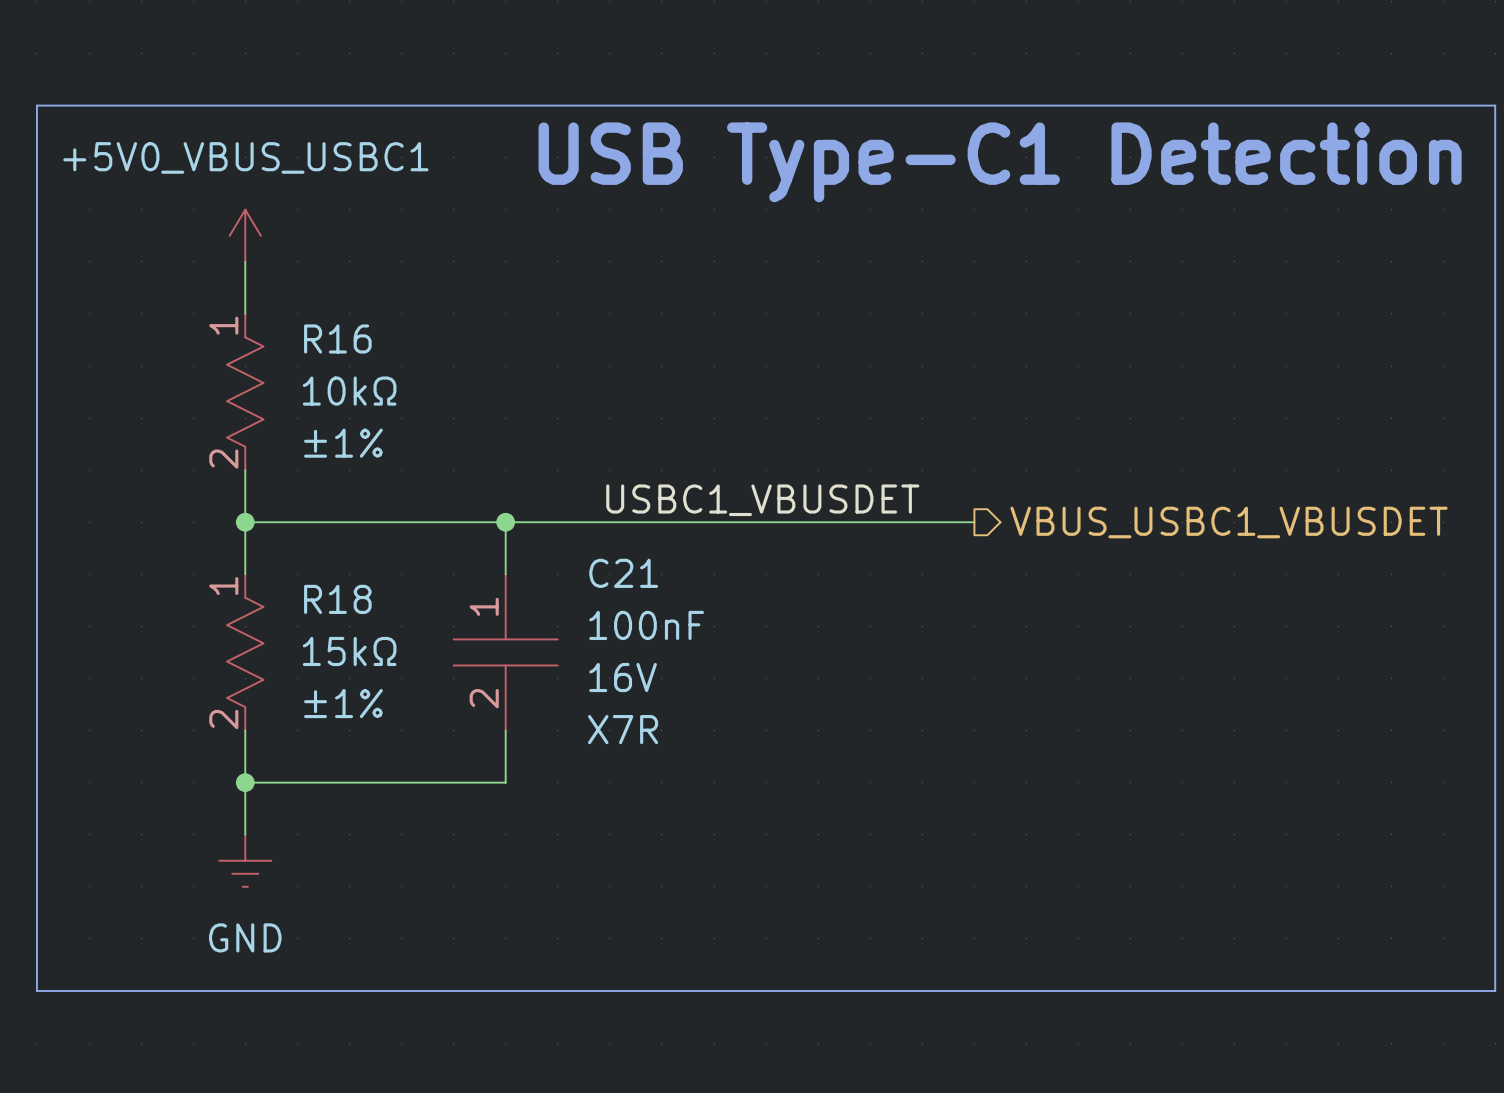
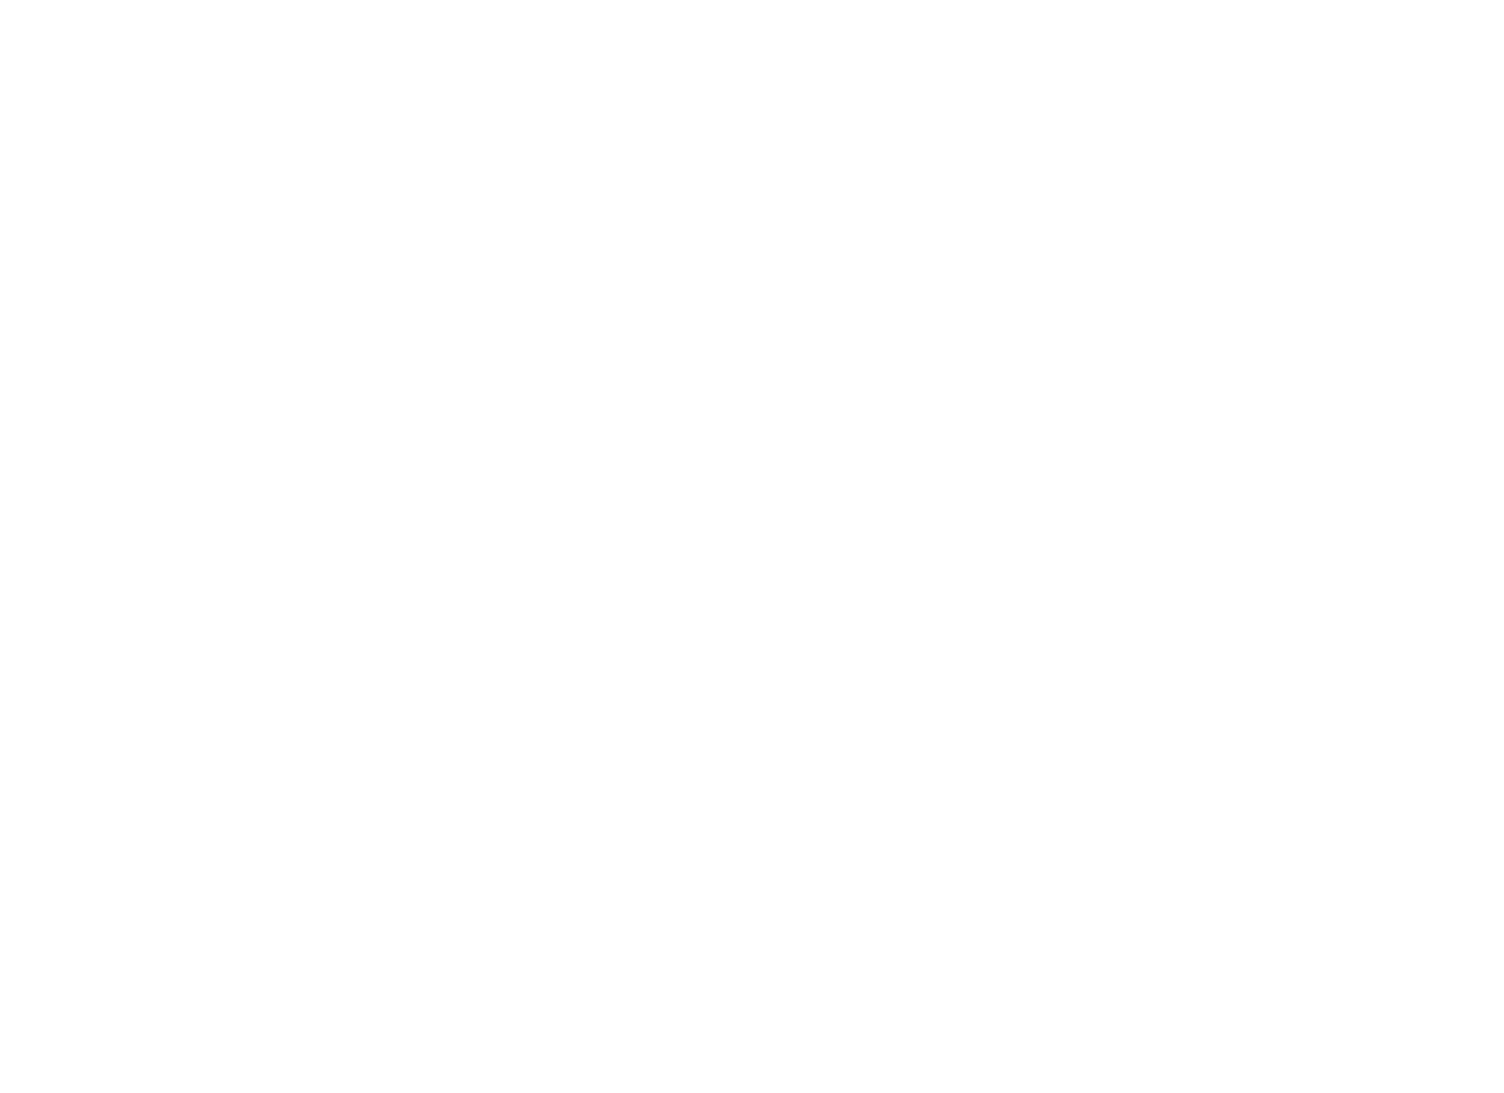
line: (36, 105) (1495, 105) (1495, 990) (36, 990) (36, 105) -> none
text: USB Type-C1 Detection (1000, 162) -> none
power symbol: +5V0_VBUS_USBC1 (245, 235) -> none
wire: (245, 261) (245, 313) -> none
R16: (245, 392) -> none
wire: (245, 470) (245, 574) -> none
label: USBC1_VBUSDET (762, 500) -> none
wire: (245, 522) (974, 522) -> none
junction: (245, 522) -> none
wire: (505, 522) (505, 574) -> none
junction: (505, 522) -> none
hierarchical label: VBUS_USBC1_VBUSDET (1229, 522) -> none
R18: (245, 652) -> none
C21: (505, 652) -> none
wire: (245, 730) (245, 834) -> none
wire: (505, 730) (505, 782) (245, 782) -> none
junction: (245, 782) -> none
power symbol: GND (245, 860) -> none

